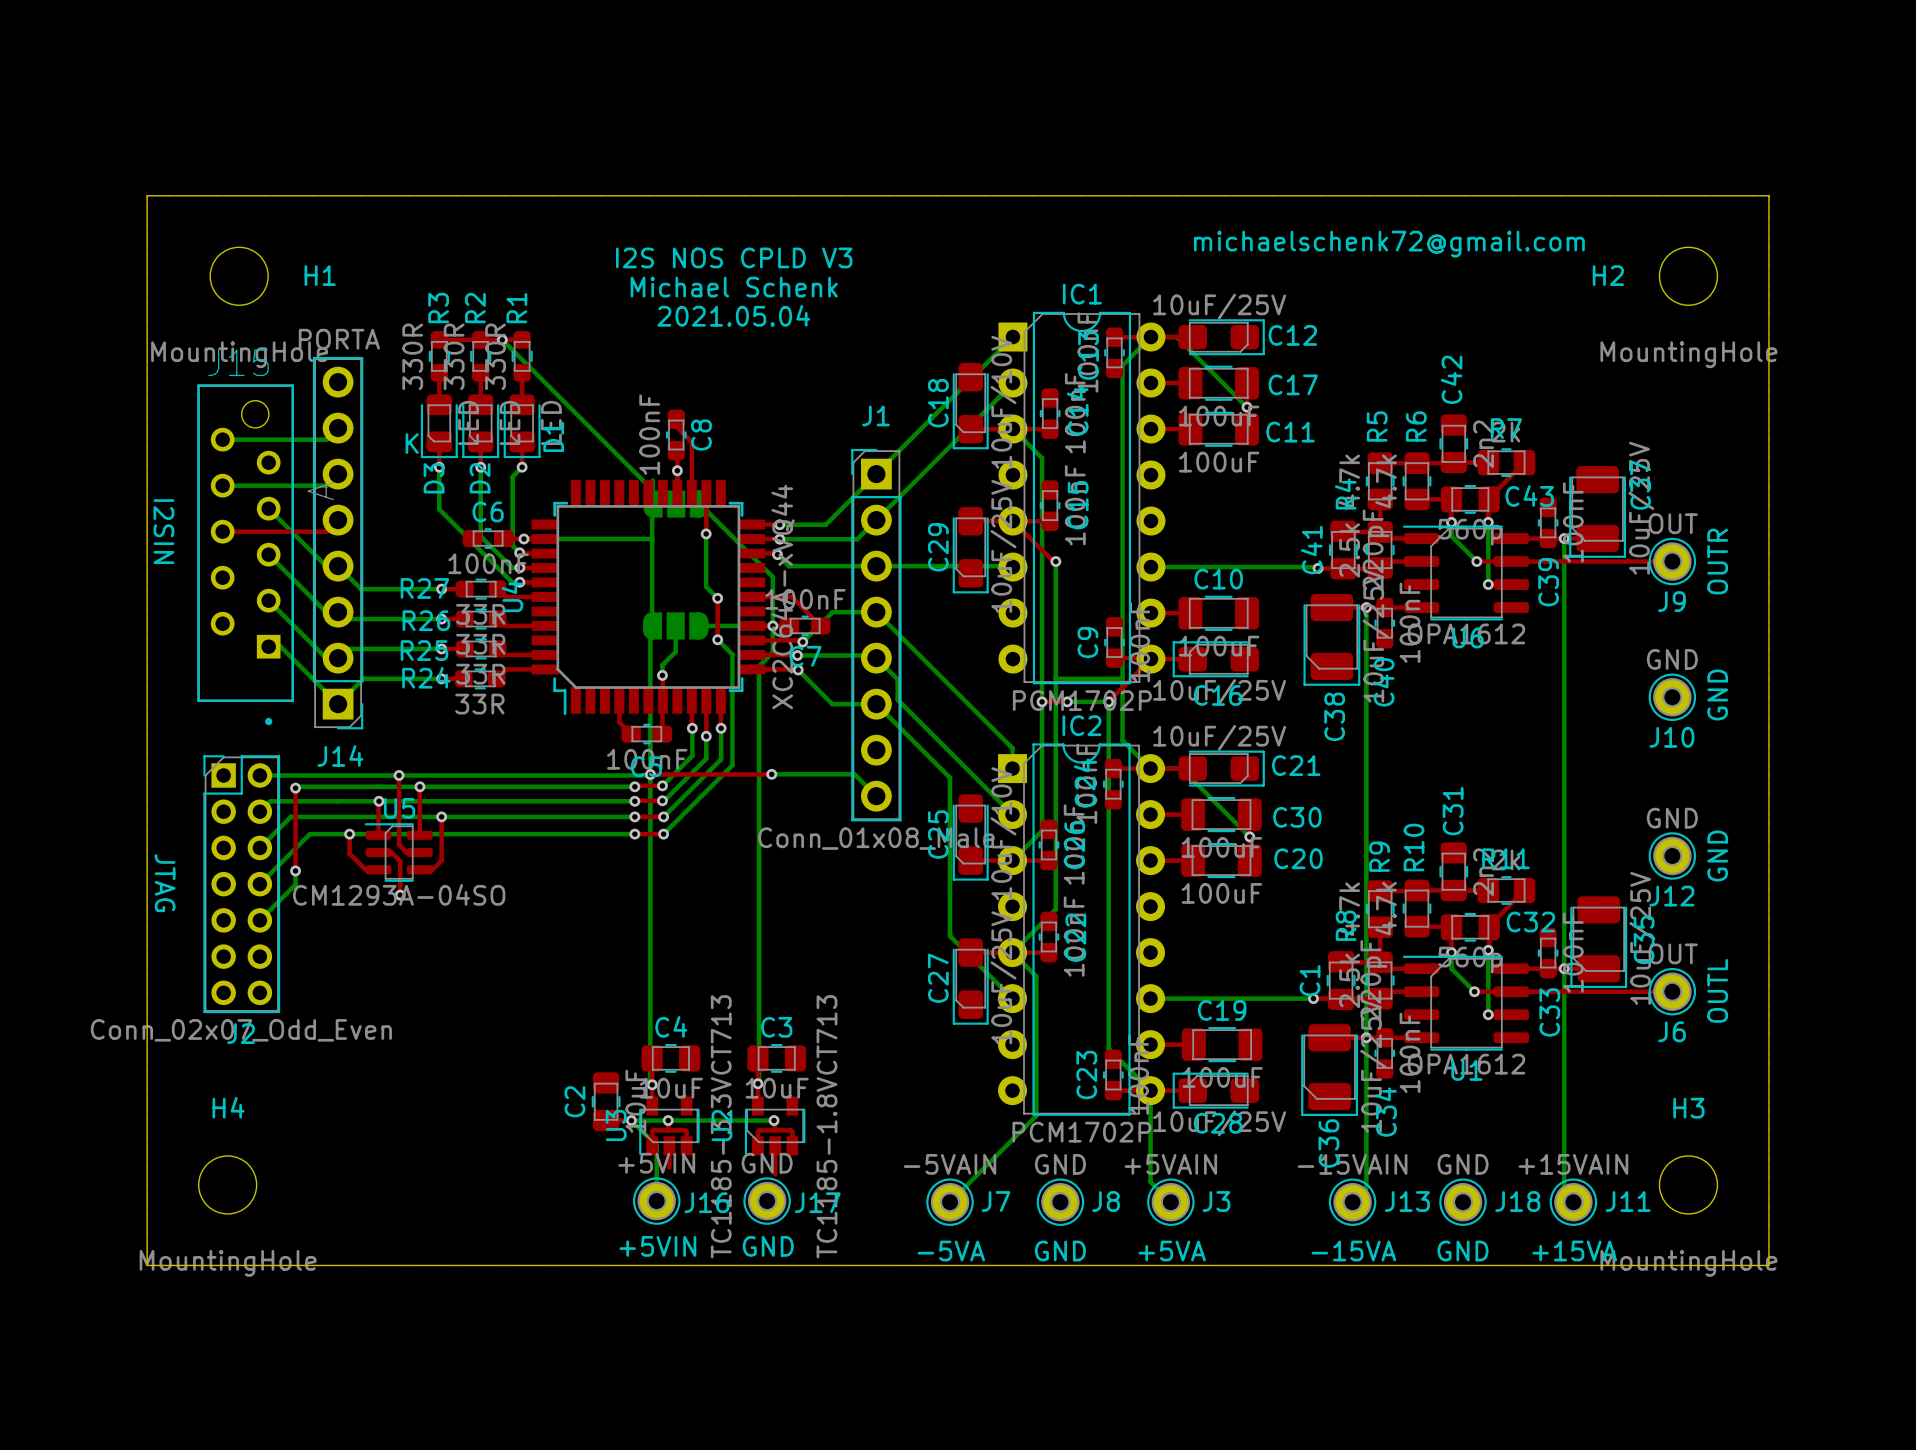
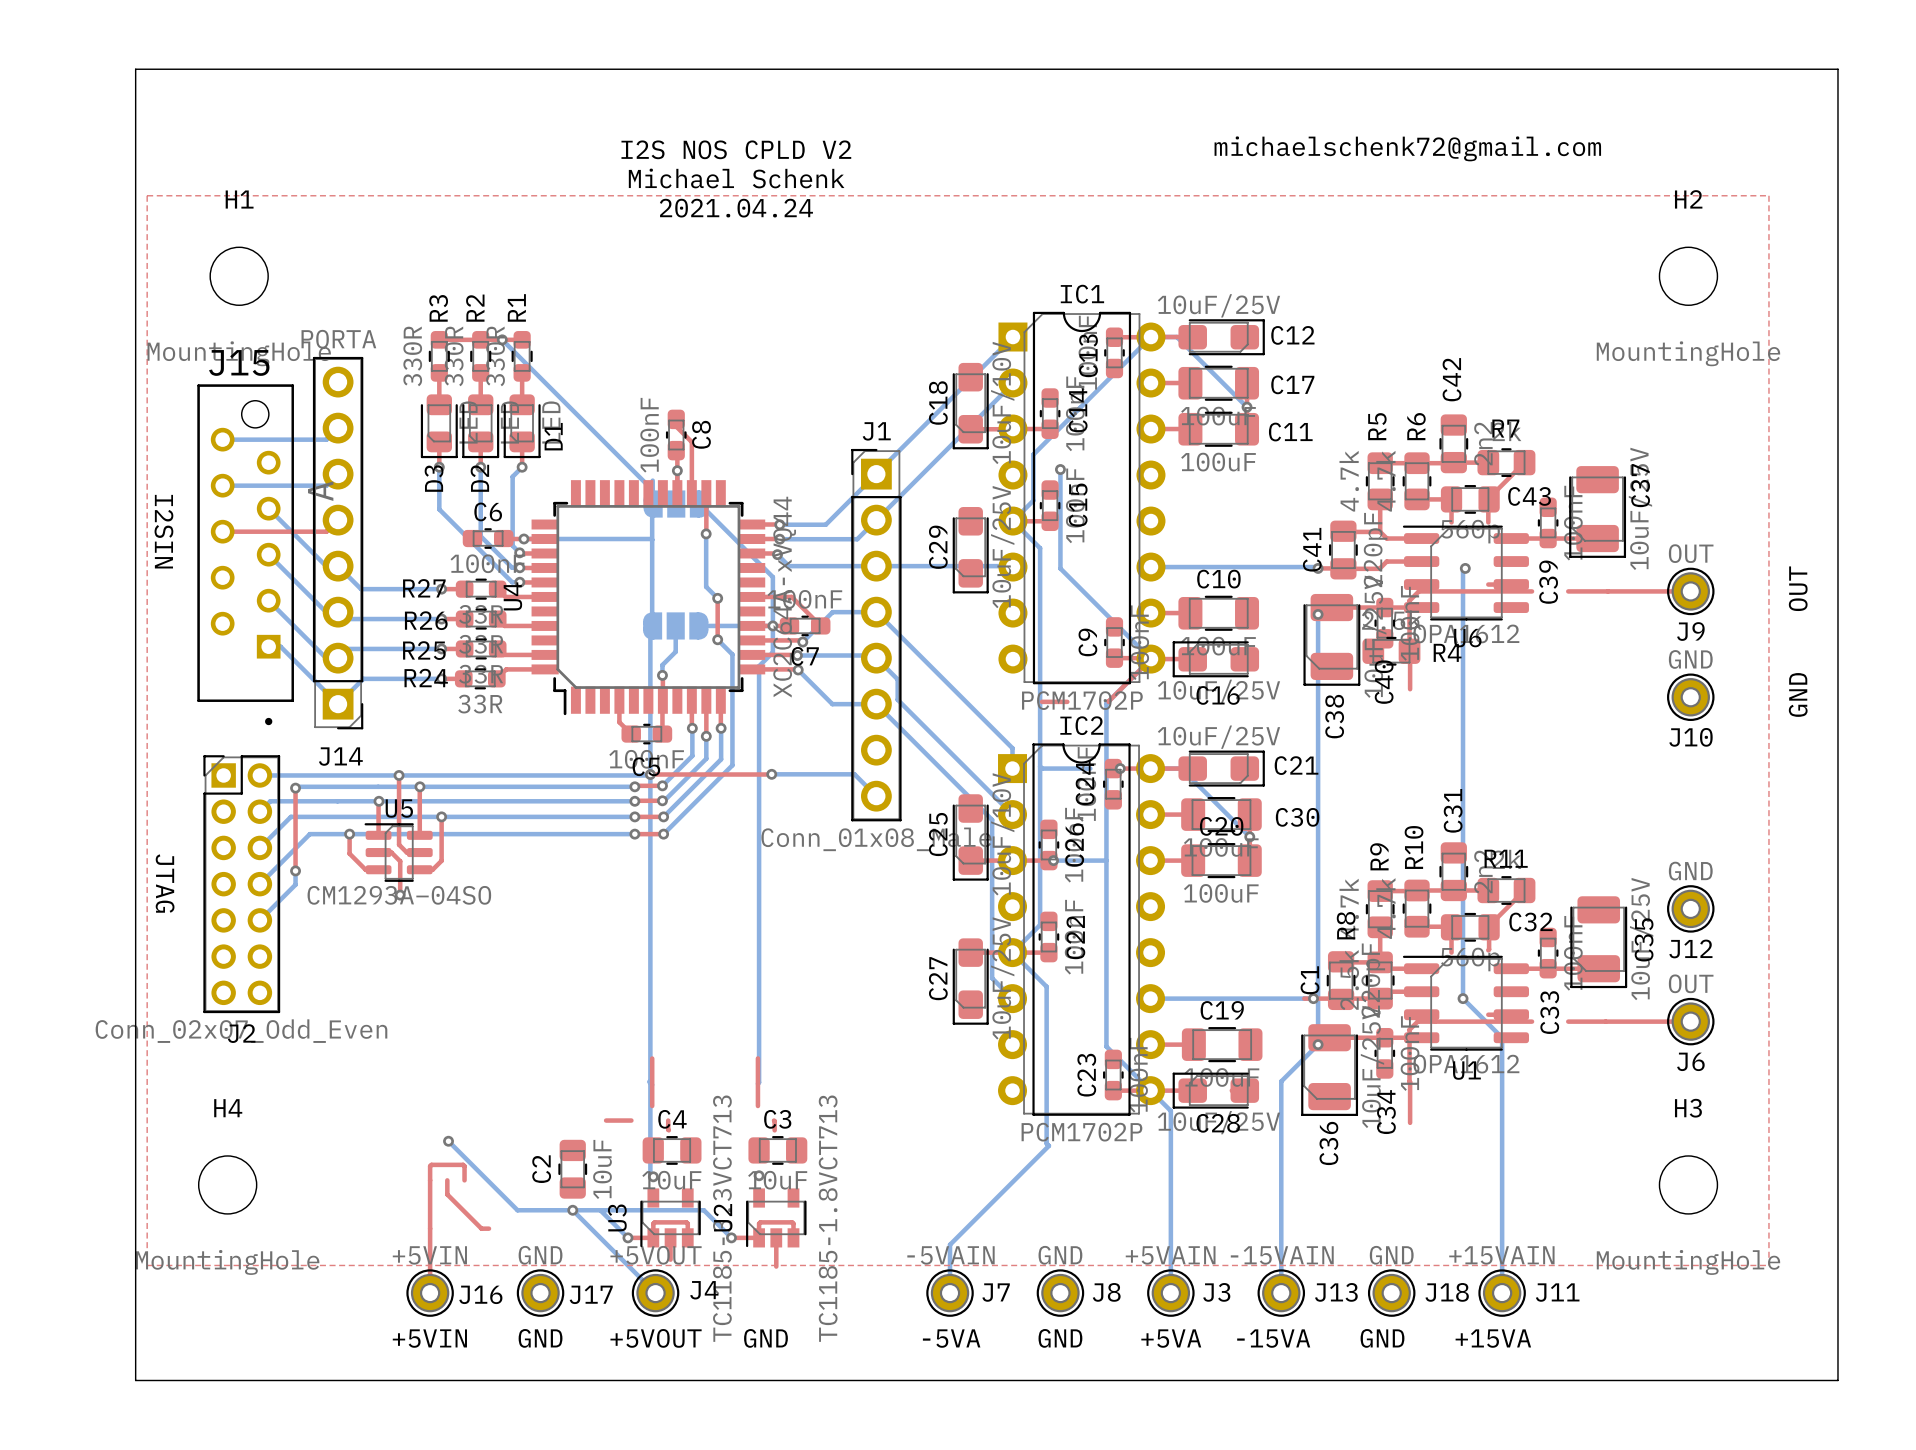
text: none -> I2S NOS CPLD V2 (736, 149)
board edge: (147, 195) (147, 1265) (1768, 1265) (1768, 195) (147, 195) -> (135, 69) (135, 1380) (1837, 1380) (1837, 69) (135, 69)
text: none -> 2021.04.24 (736, 208)
text position: michaelschenk72@gmail.com (1389, 244) -> michaelschenk72@gmail.com (1407, 148)
text: I2S NOS CPLD V3 (734, 257) -> none
H1 name position: H1 (320, 275) -> H1 (239, 199)
H2 name position: H2 (1608, 275) -> H2 (1688, 199)
text position: Michael Schenk (734, 287) -> Michael Schenk (736, 178)
text: 2021.05.04 (733, 315) -> none
bottom track: (1122, 365) (1122, 740) (1150, 768) -> (1122, 365) (1033, 454) (1033, 500) (1012, 521) (1040, 548) (1040, 925)
J1 name position: J1 (875, 415) -> J1 (876, 431)
bottom track: (1012, 429) (1042, 458) (1042, 831) (1012, 860) -> none
text: K (412, 443) -> none
top track: (970, 521) (1012, 521) (1053, 561) (1055, 561) -> none
bottom track: (1451, 522) (1451, 536) (1476, 561) -> none
via: (1451, 522) -> none
bottom track: (1488, 522) (1488, 584) -> none
via: (1488, 522) -> none
bottom track: (1564, 538) (1564, 1193) (1573, 1202) -> none
via: (1564, 538) -> none
R4 rotation: 0° (1380, 550) -> 90° clockwise (1391, 651)
R4 position: (1380, 550) -> (1391, 651)
bottom track: (1055, 561) (1055, 909) (1040, 925) -> none
via position: (1055, 561) -> (1060, 469)
top track: (1476, 561) (1672, 561) -> none
via position: (1476, 561) -> (1465, 568)
J9 position: (1672, 561) -> (1690, 591)
text: OUTR (1717, 561) -> none
bottom track: none -> (1465, 568) (1463, 570) (1463, 998) (1502, 1037) (1502, 1293)
via: (1488, 584) -> none
text: none -> OUT (1798, 588)
top track: none -> (1532, 591) (1418, 591) (1409, 600) (1410, 689)
top track: none -> (1568, 591) (1690, 591)
bottom track: (1366, 607) (1366, 1188) (1352, 1202) -> none
via position: (1366, 607) -> (1318, 614)
bottom track: none -> (1318, 614) (1318, 1044) (1281, 1081) (1281, 1293)
bottom track: (1055, 678) (1122, 678) -> none
text position: GND (1717, 694) -> GND (1798, 694)
J10 position: (1672, 697) -> (1690, 697)
via: (1042, 701) -> none
bottom track: (1067, 701) (1108, 701) (1108, 1048) -> (1060, 469) (1060, 568) (1150, 659) (1106, 703) (1106, 1046) (1108, 1048)
via: (1067, 701) -> none
via: (1108, 701) -> none
bottom track: none -> (1040, 766) (1042, 768) (1090, 768)
via: none -> (1120, 768)
bottom track: (950, 777) (950, 936) (992, 978) -> (950, 777) (992, 819) (992, 978)
J12 position: (1672, 855) -> (1690, 908)
text: GND (1717, 855) -> none
C20 name position: C20 (1298, 858) -> C20 (1221, 826)
bottom track: none -> (1053, 860) (1106, 860)
via: none -> (1053, 860)
bottom track: (1488, 950) (1488, 1014) -> none
via: (1488, 950) -> none
bottom track: (1451, 952) (1451, 968) (1474, 991) -> none
via: (1451, 952) -> none
via: (1564, 968) -> none
bottom track: (1036, 976) (1036, 1115) (950, 1202) -> (1036, 976) (1046, 986) (1046, 1143) (1048, 1145) (950, 1244) (950, 1293)
text: OUTL (1717, 990) -> none
top track: (1474, 991) (1672, 991) -> none
via position: (1474, 991) -> (1463, 998)
J6 position: (1672, 991) -> (1690, 1021)
top track: none -> (1304, 998) (1313, 998)
via: (1488, 1014) -> none
top track: none -> (1532, 1021) (1417, 1021) (1409, 1029) (1410, 1122)
top track: none -> (1568, 1021) (1690, 1021)
via position: (1366, 1037) -> (1318, 1044)
C4 position: (670, 1058) -> (672, 1150)
C3 position: (776, 1058) -> (777, 1150)
bottom track: none -> (650, 1082) (650, 1173) (653, 1176)
via: (757, 1083) -> none
via: (652, 1084) -> none
bottom track: (1150, 1090) (1150, 1181) (1170, 1202) -> (1150, 1090) (1170, 1110) (1170, 1293)
C2 position: (606, 1101) -> (572, 1169)
via: (631, 1120) -> none
via: (668, 1120) -> none
bottom track: (774, 1120) (631, 1120) (656, 1145) (656, 1201) -> none
via: (774, 1120) -> none
U3 position: (669, 1125) -> (670, 1217)
U2 position: (775, 1125) -> (776, 1217)
bottom track: none -> (448, 1141) (517, 1210) (703, 1210) (731, 1237)
via: none -> (448, 1141)
top track: (652, 1145) (653, 1130) (685, 1130) (686, 1145) -> none
top track: (669, 1145) (669, 1167) -> (670, 1237) (670, 1259)
top track: (757, 1145) (759, 1130) (790, 1130) (792, 1145) -> none
top track: (775, 1145) (775, 1174) -> (776, 1237) (776, 1266)
via: none -> (759, 1175)
via: none -> (653, 1176)
top track: none -> (447, 1180) (447, 1194) (481, 1228) (488, 1228)
top track: none -> (464, 1180) (463, 1164) (430, 1166) (430, 1293)
J16 position: (656, 1201) -> (430, 1293)
J17 position: (767, 1201) -> (540, 1293)
J7 position: (950, 1202) -> (950, 1293)
J8 position: (1060, 1202) -> (1060, 1293)
J3 position: (1170, 1202) -> (1170, 1293)
J13 position: (1352, 1202) -> (1281, 1293)
J18 position: (1463, 1202) -> (1391, 1293)
J11 position: (1573, 1202) -> (1502, 1293)
bottom track: none -> (572, 1210) (655, 1293)
via: none -> (572, 1210)
bottom track: none -> (600, 1210) (627, 1237)
top track: none -> (627, 1237) (653, 1237) (654, 1222) (686, 1222) (687, 1237)
via: none -> (627, 1237)
top track: none -> (731, 1237) (759, 1237) (760, 1222) (792, 1222) (793, 1237)
via: none -> (731, 1237)
text position: +5VIN (657, 1246) -> +5VIN (429, 1338)
text position: GND (768, 1246) -> GND (765, 1338)
text position: -5VA (951, 1250) -> -5VA (951, 1338)
text position: GND (1060, 1250) -> GND (1060, 1338)
text position: +5VA (1172, 1250) -> +5VA (1171, 1338)
text position: -15VA (1353, 1250) -> -15VA (1273, 1338)
text position: GND (1463, 1250) -> GND (1382, 1338)
text position: +15VA (1574, 1250) -> +15VA (1493, 1338)
J4: none -> +5VOUT (655, 1293)
text: none -> GND (540, 1338)
text: none -> +5VOUT (656, 1338)

